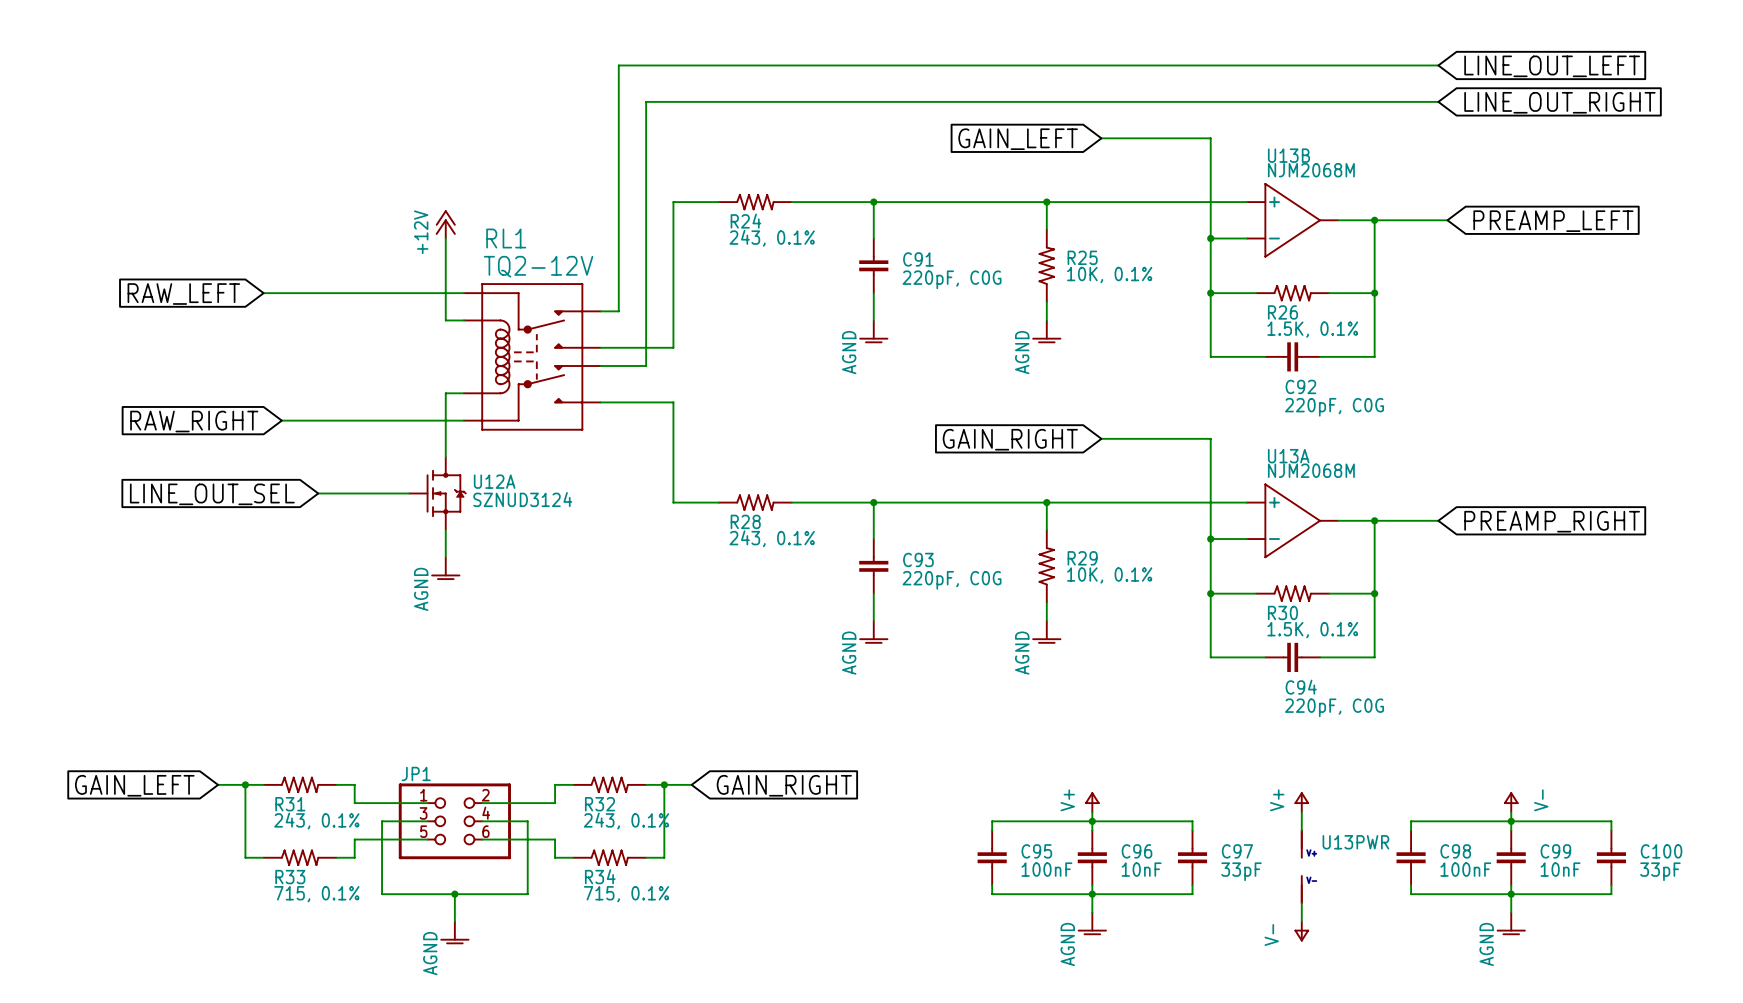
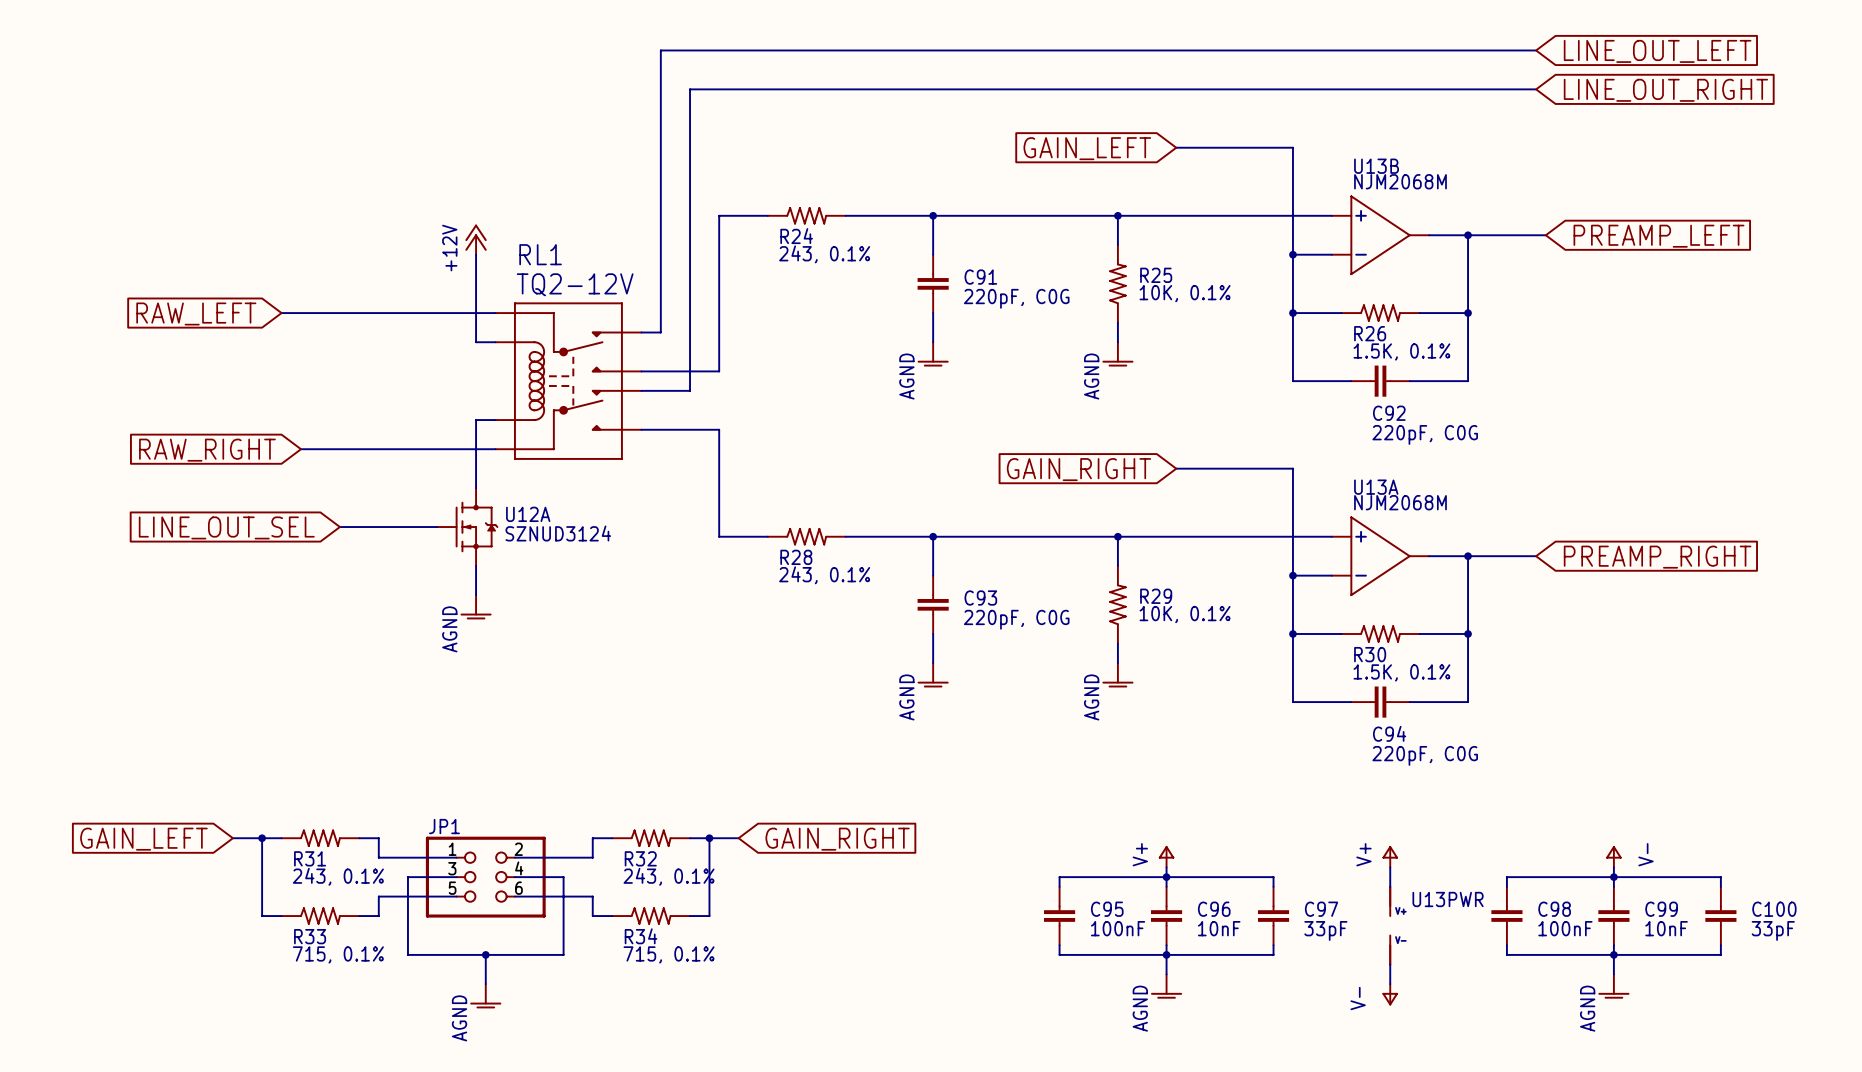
wire: (618, 65) (1438, 65) -> (660, 69) (660, 50) (1536, 50)
global label position: LINE_OUT_LEFT (1552, 66) -> LINE_OUT_LEFT (1657, 51)
wire: (646, 101) (1438, 101) -> (690, 108) (690, 89) (1536, 89)
global label position: LINE_OUT_RIGHT (1559, 102) -> LINE_OUT_RIGHT (1665, 90)

